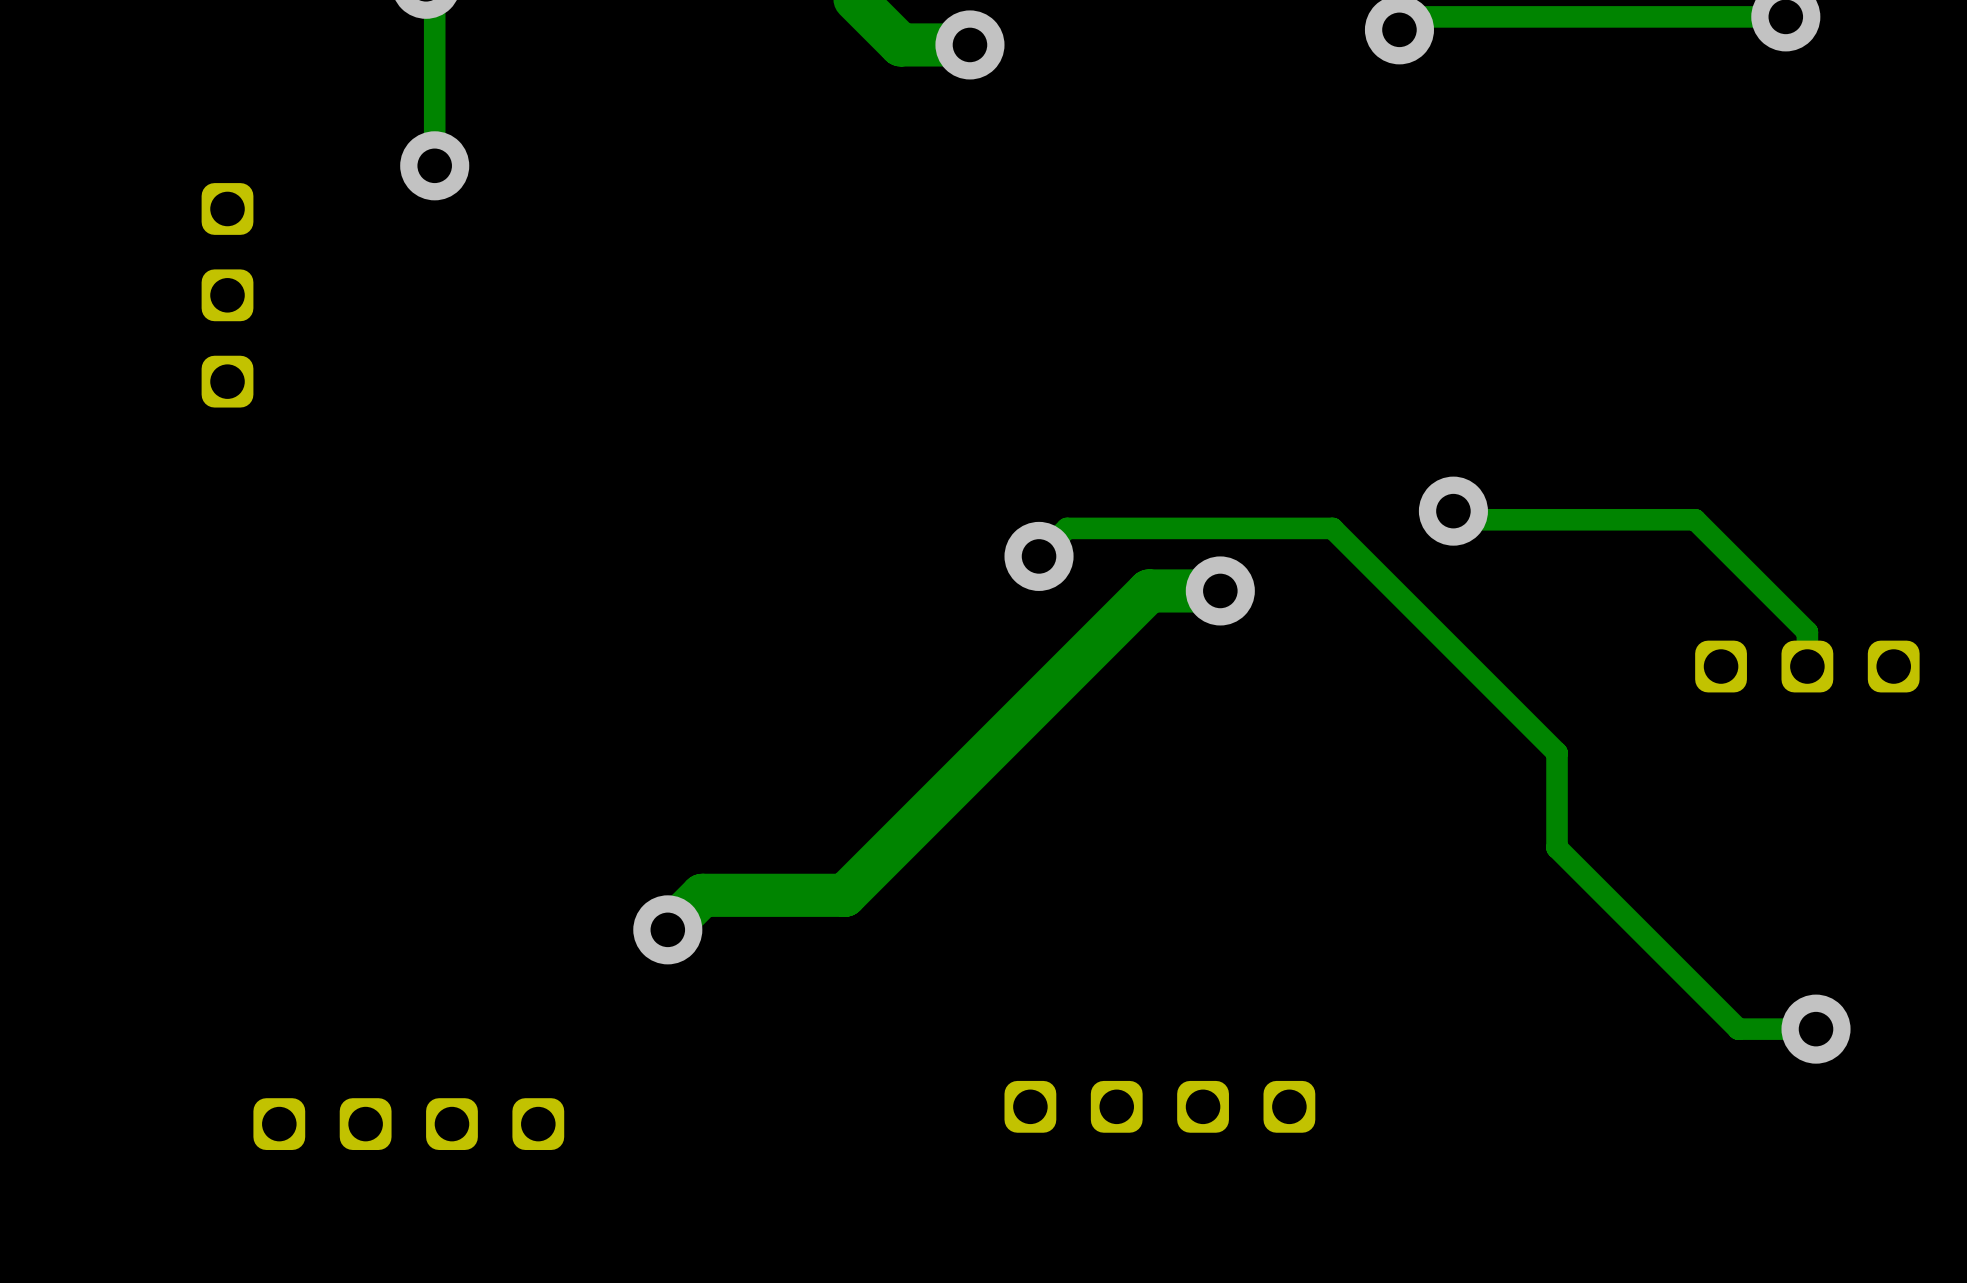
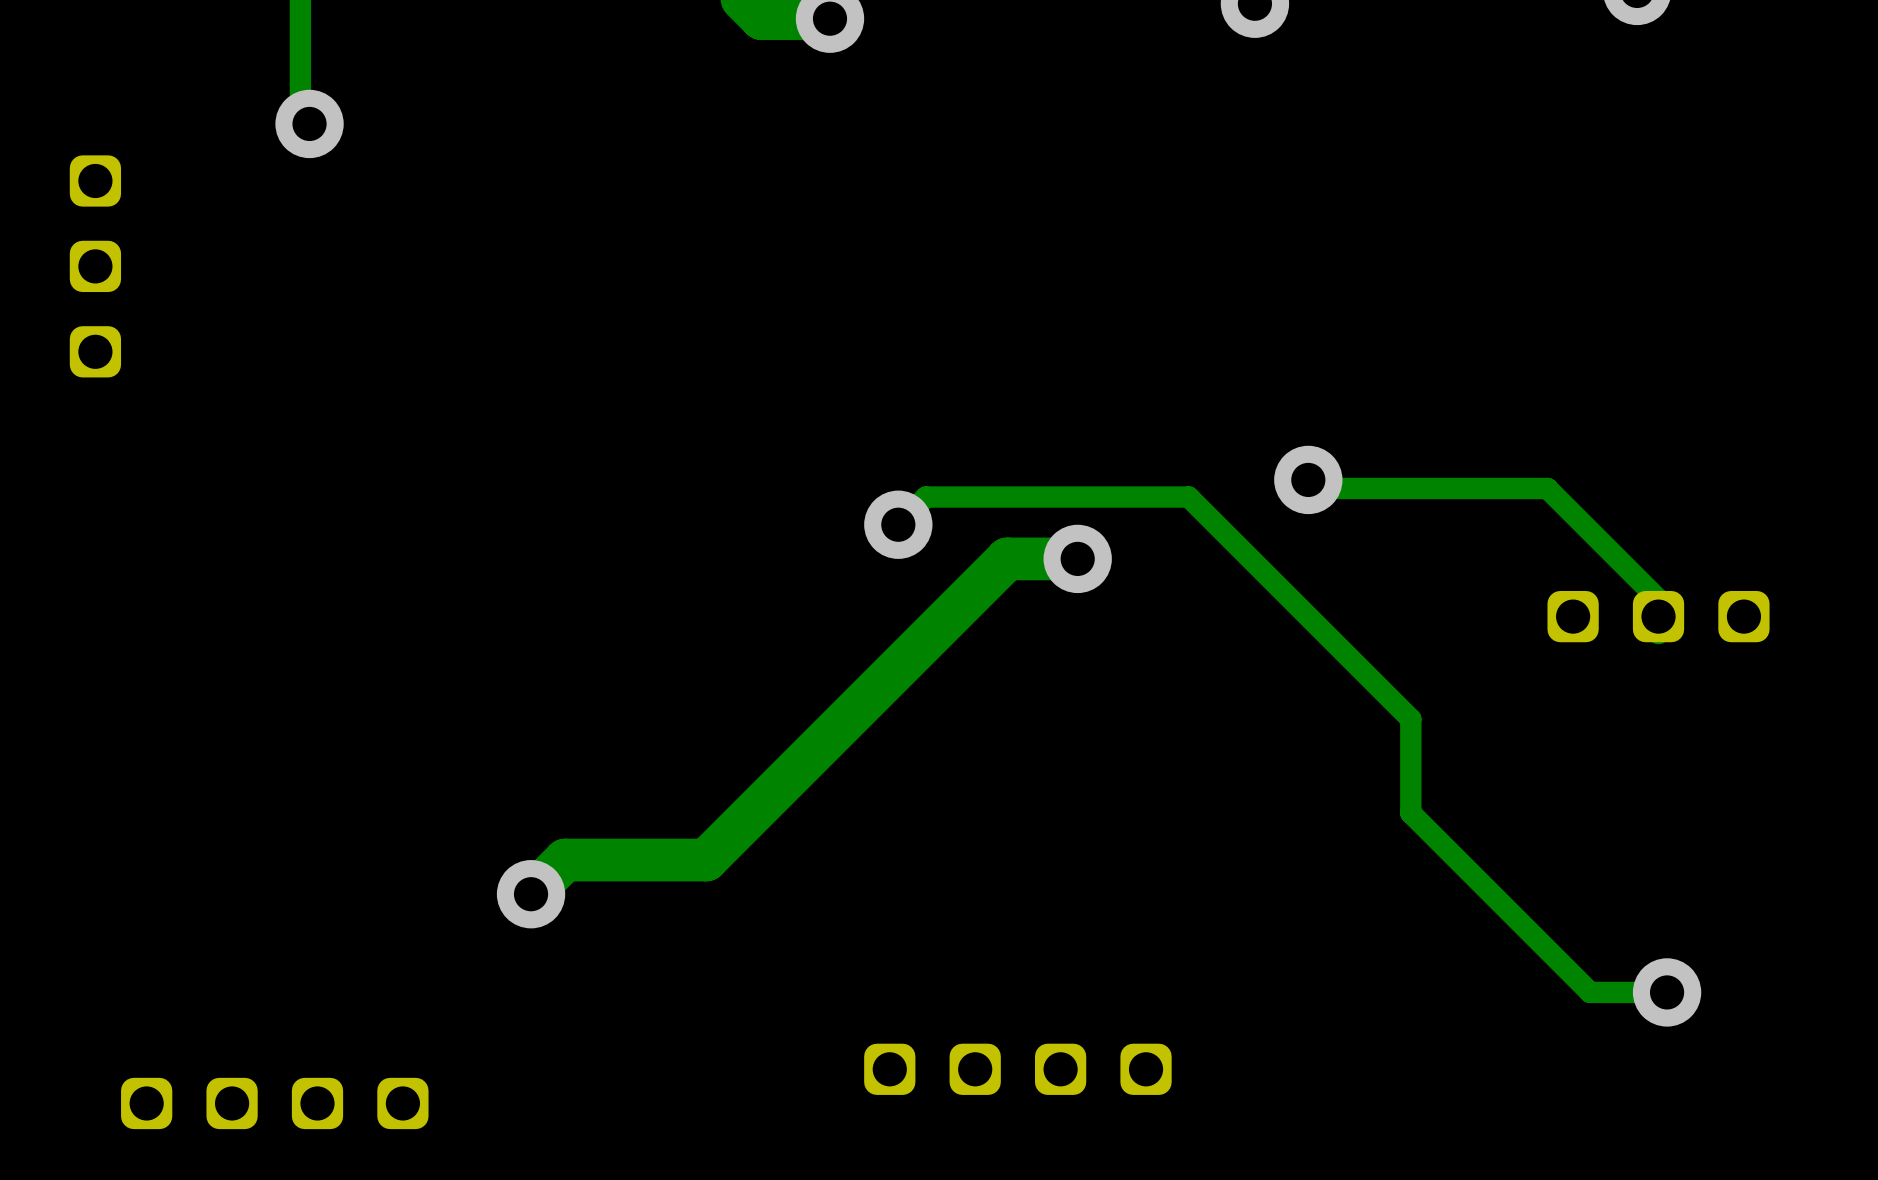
via position: (434, 165) -> (309, 123)
part position: (1807, 666) -> (1658, 616)
part position: (408, 1124) -> (274, 1103)

